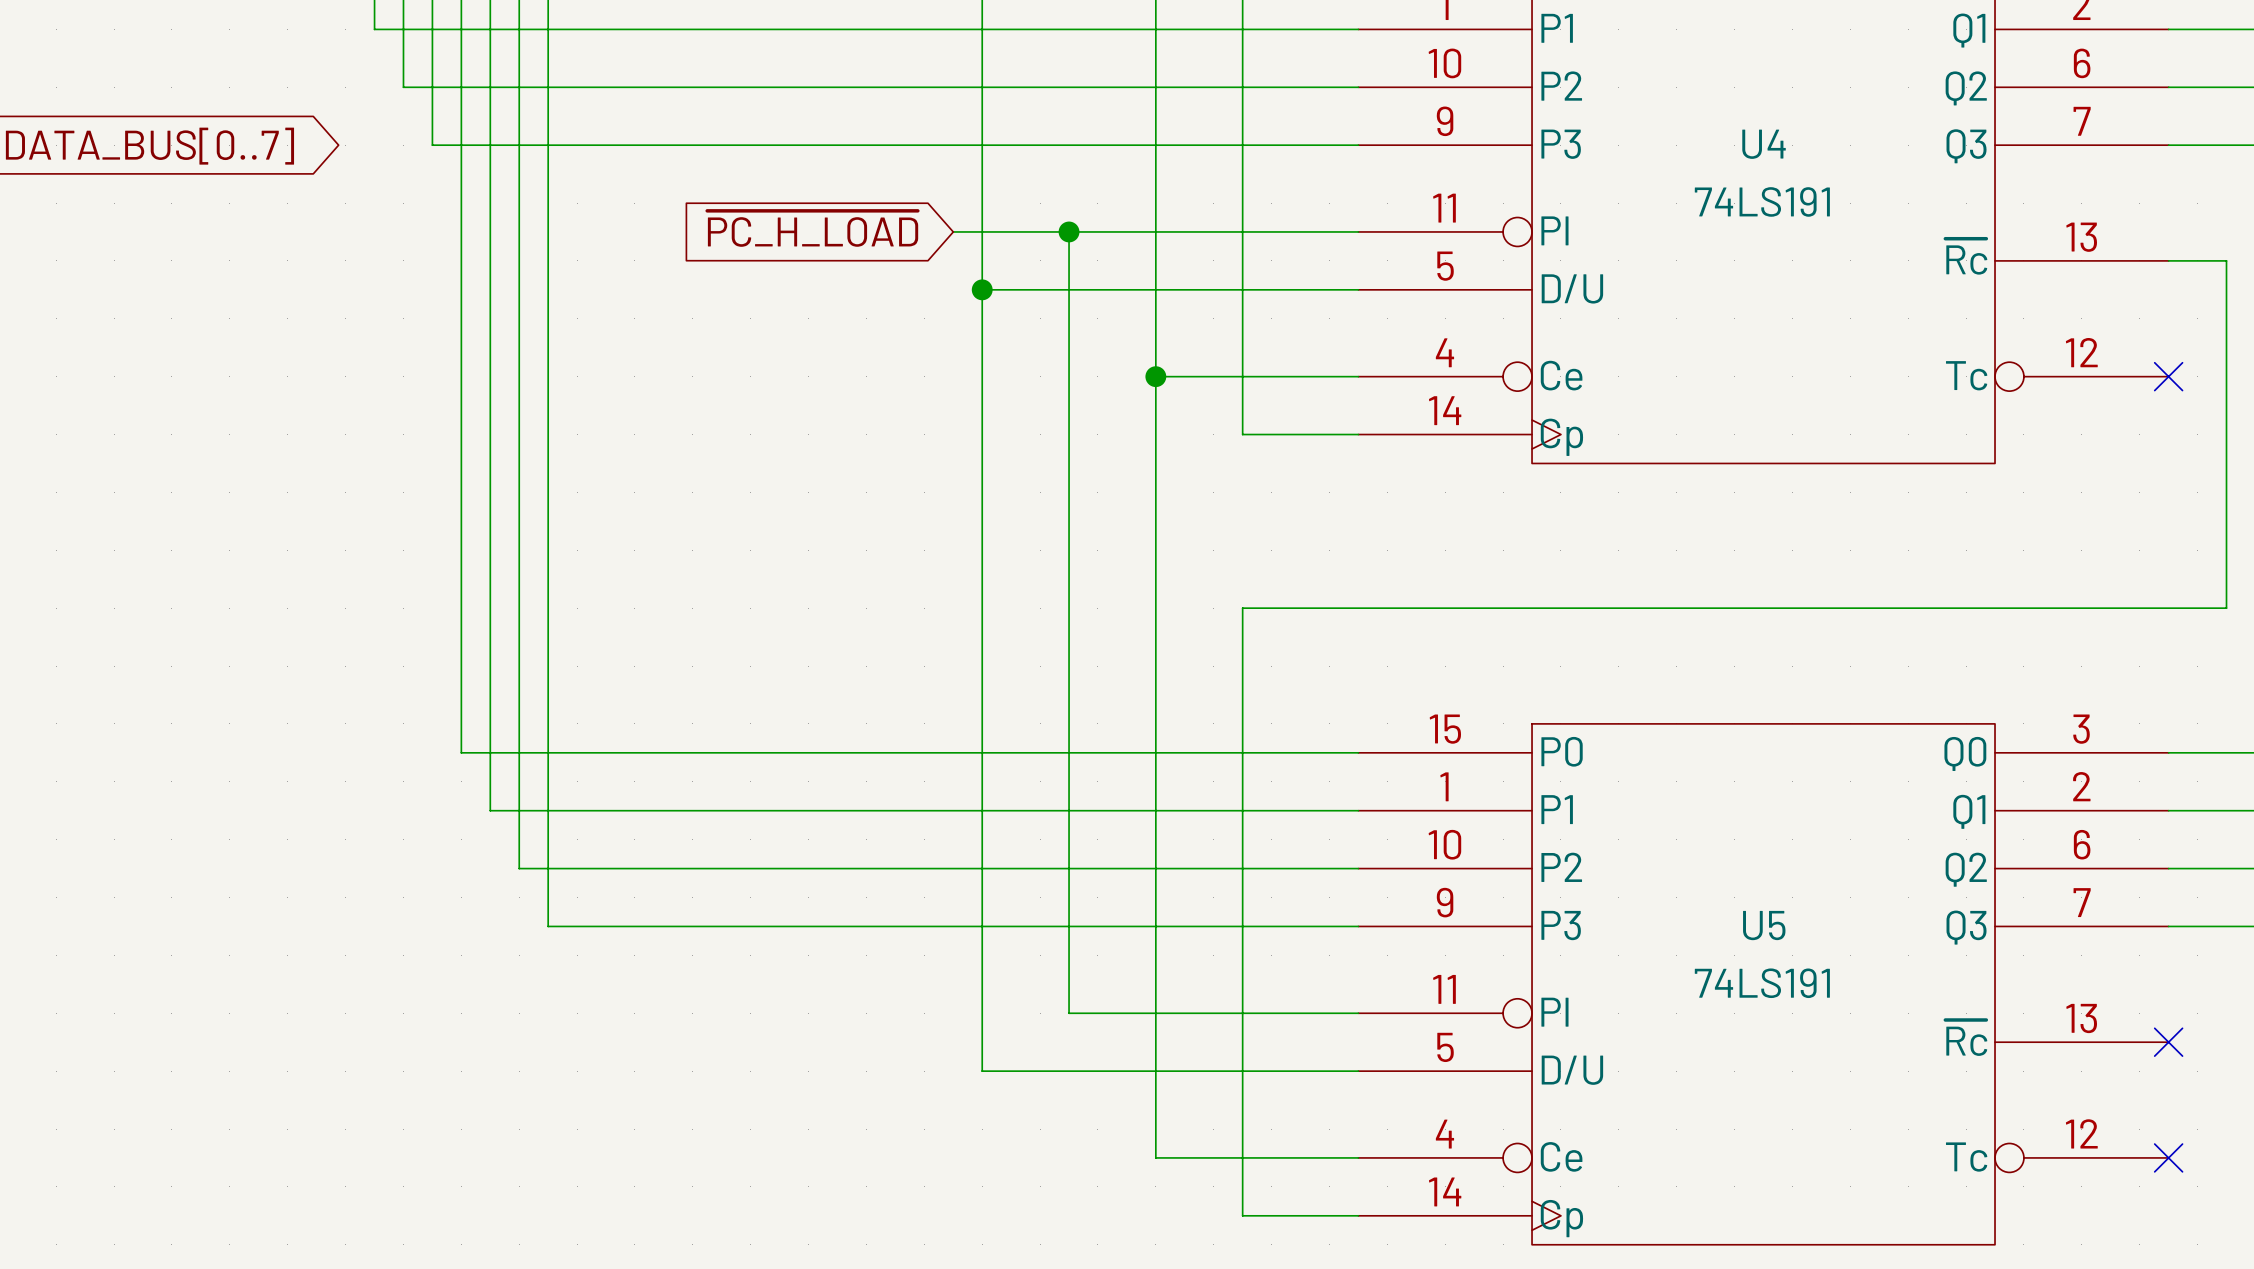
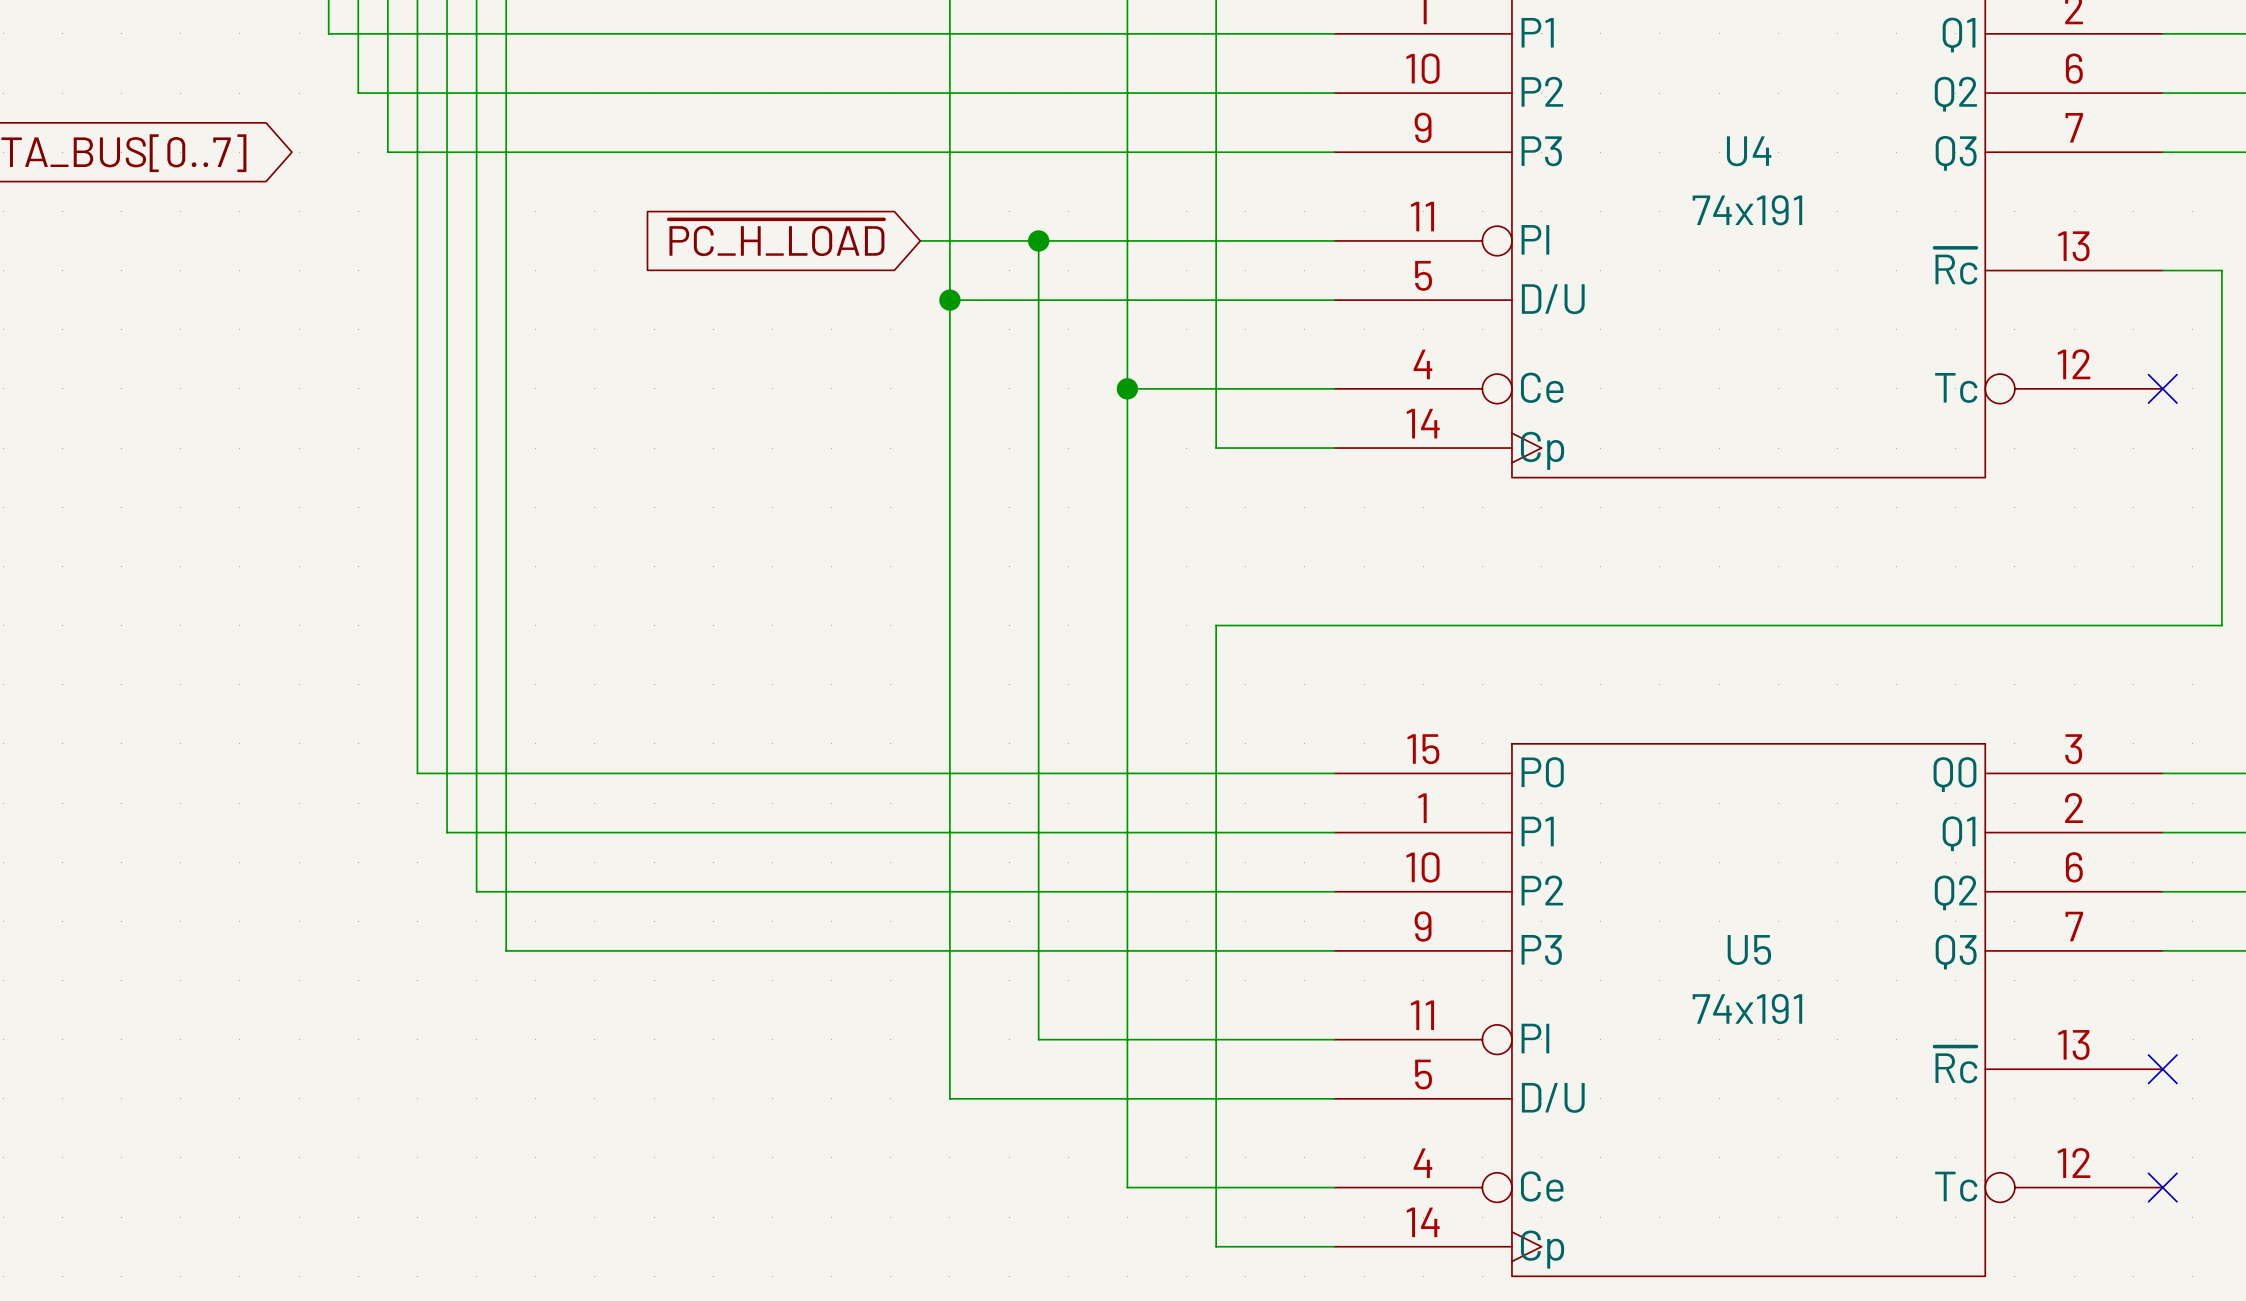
U4 value: 74LS191 (1762, 201) -> 74x191 (1747, 210)
U5 value: 74LS191 (1762, 983) -> 74x191 (1747, 1008)

